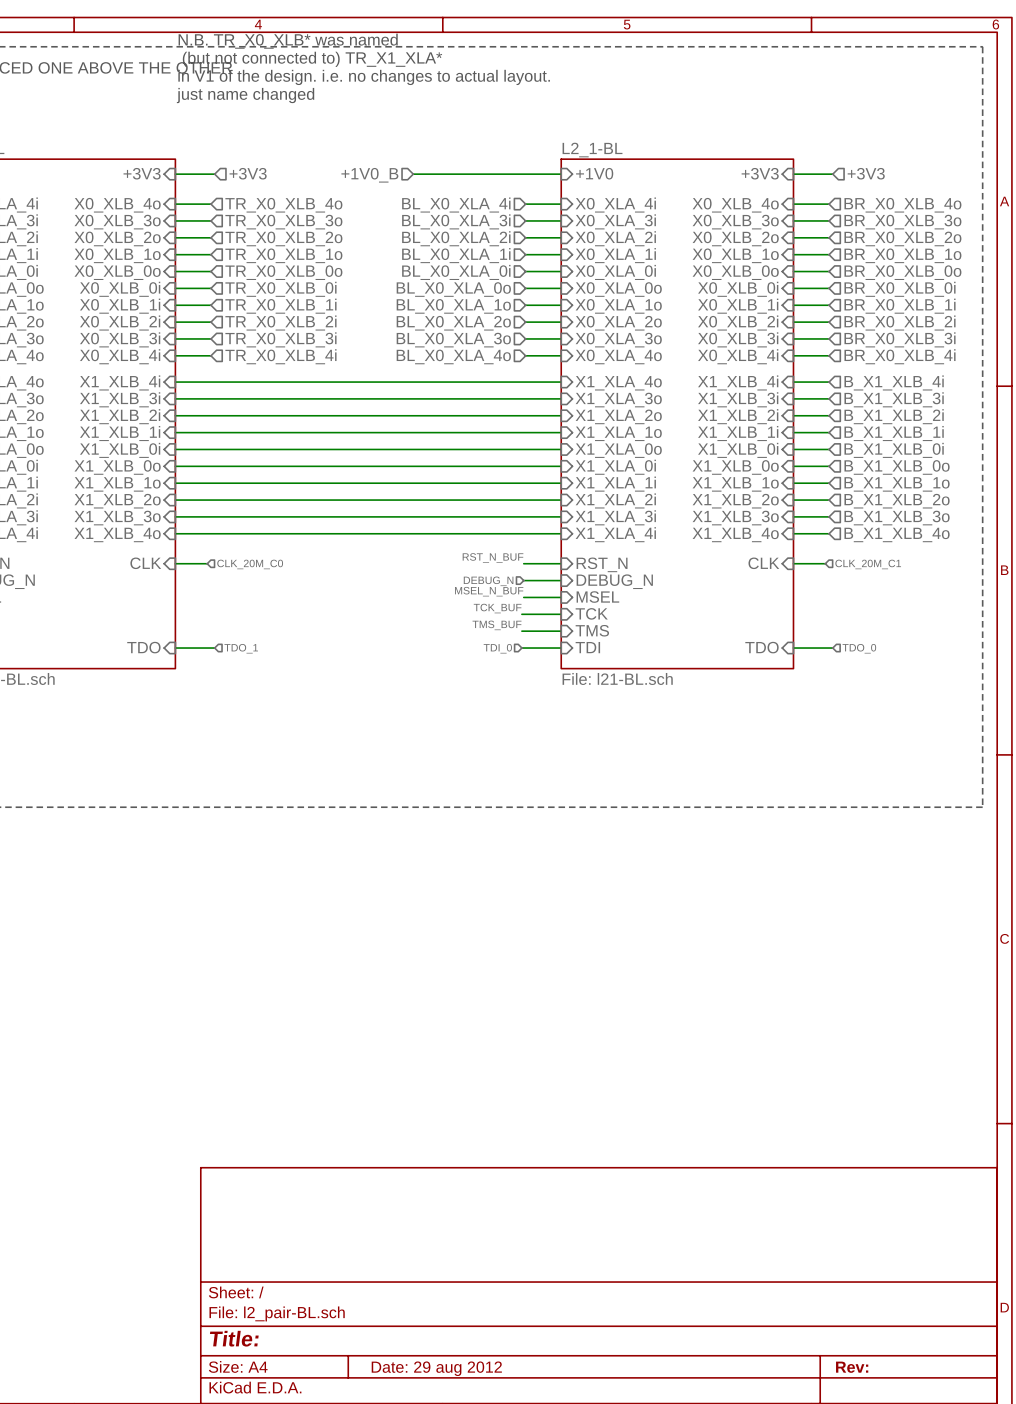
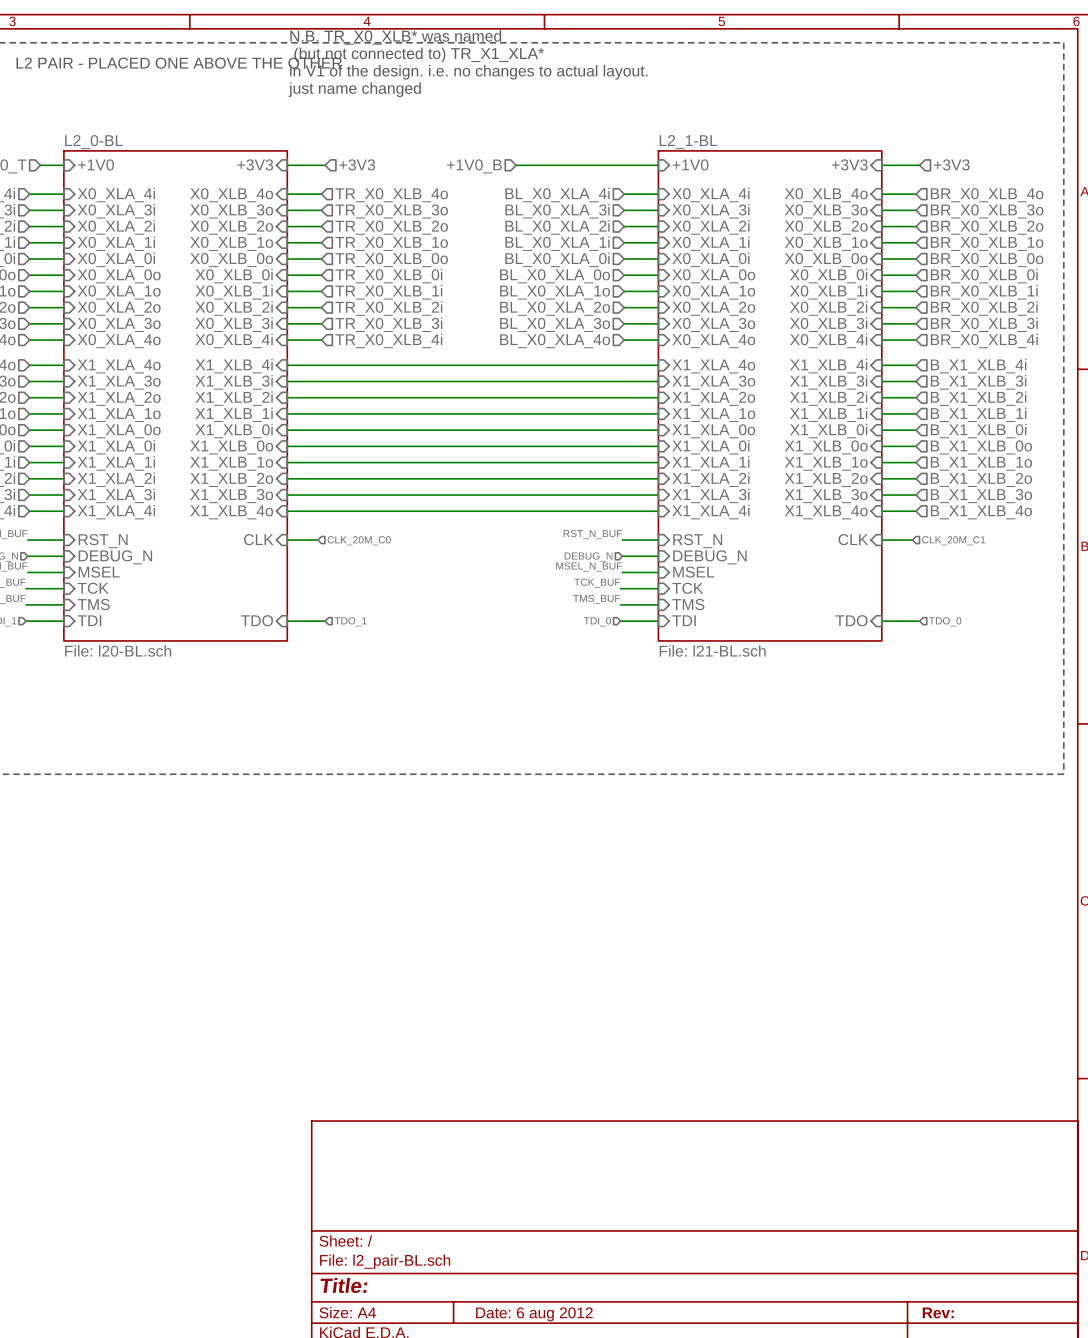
title block: Date: 29 aug 2012 (436, 1368) -> Date: 6 aug 2012 (534, 1314)

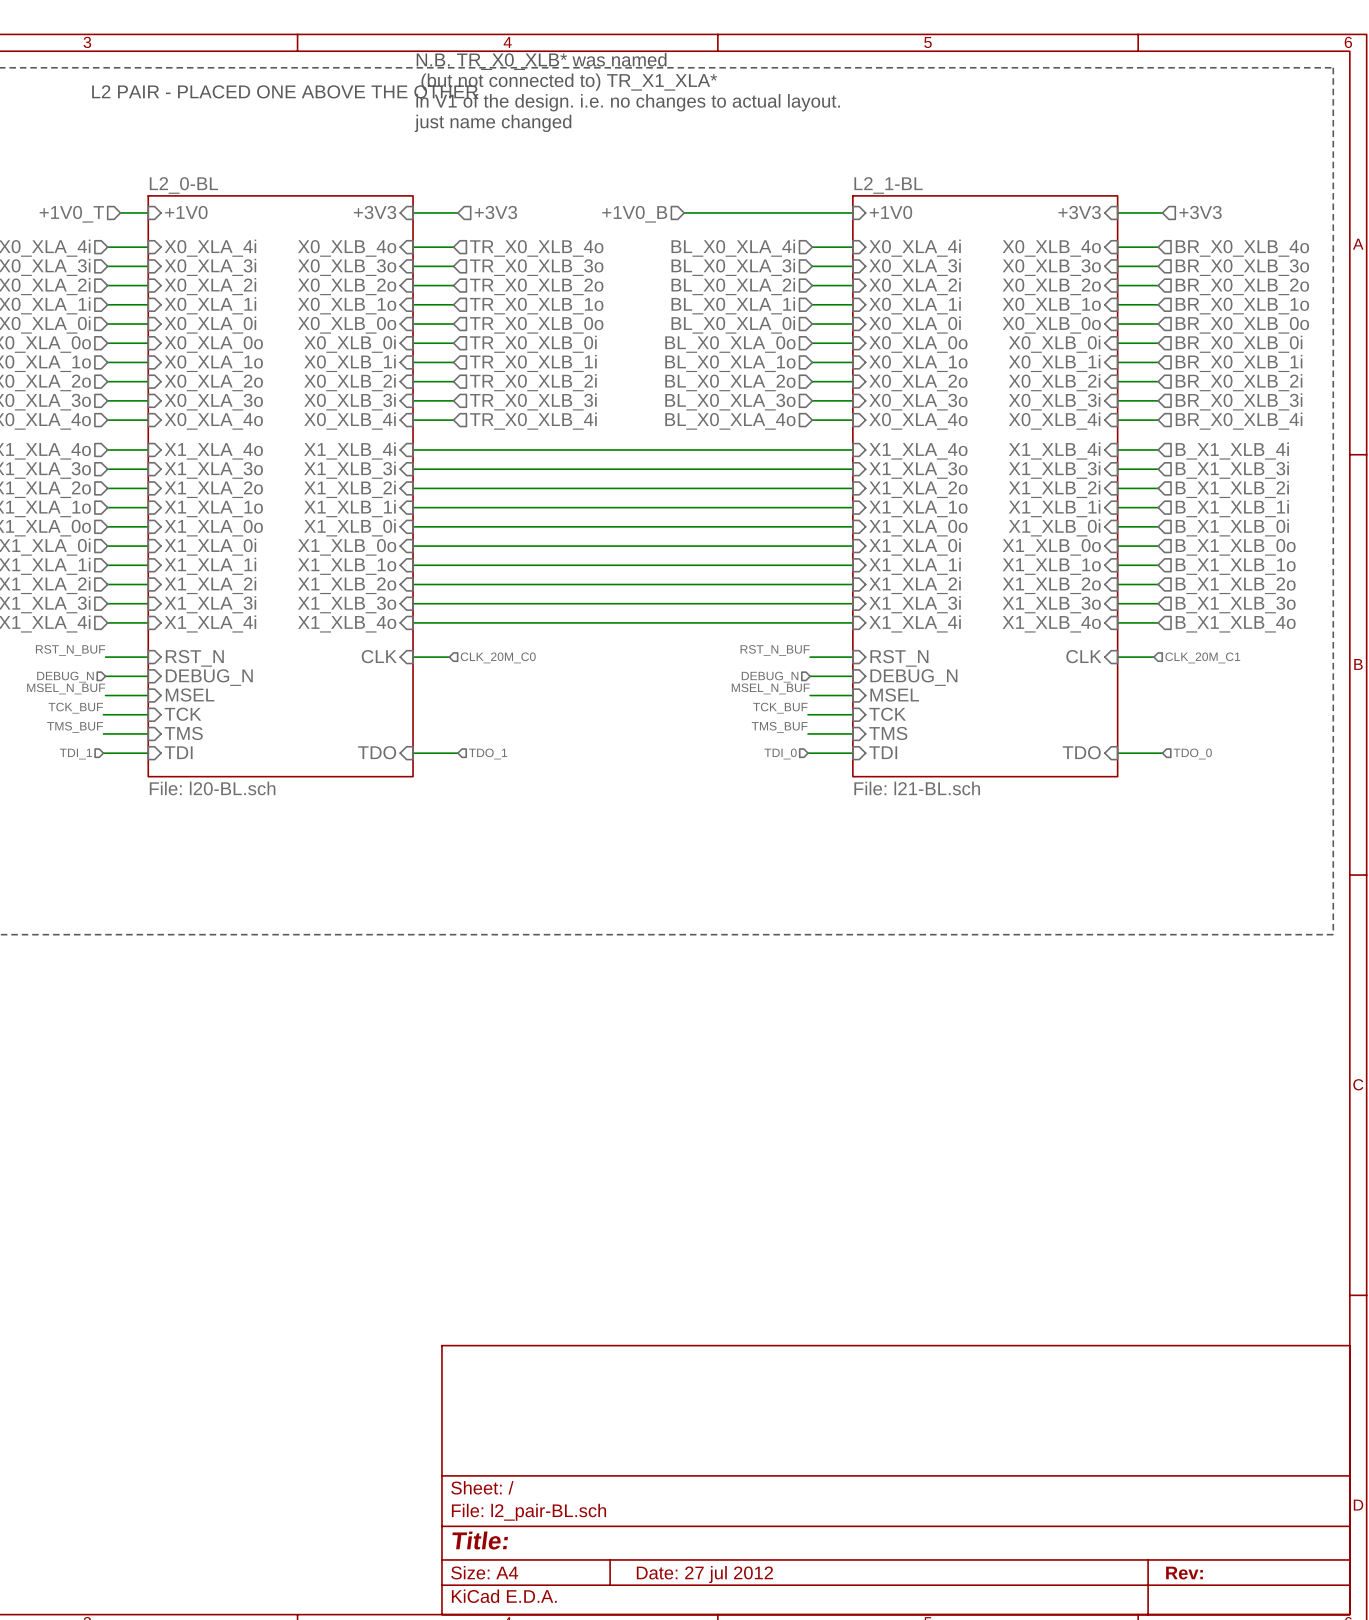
title block: Date: 6 aug 2012 (534, 1314) -> Date: 27 jul 2012 (704, 1574)

